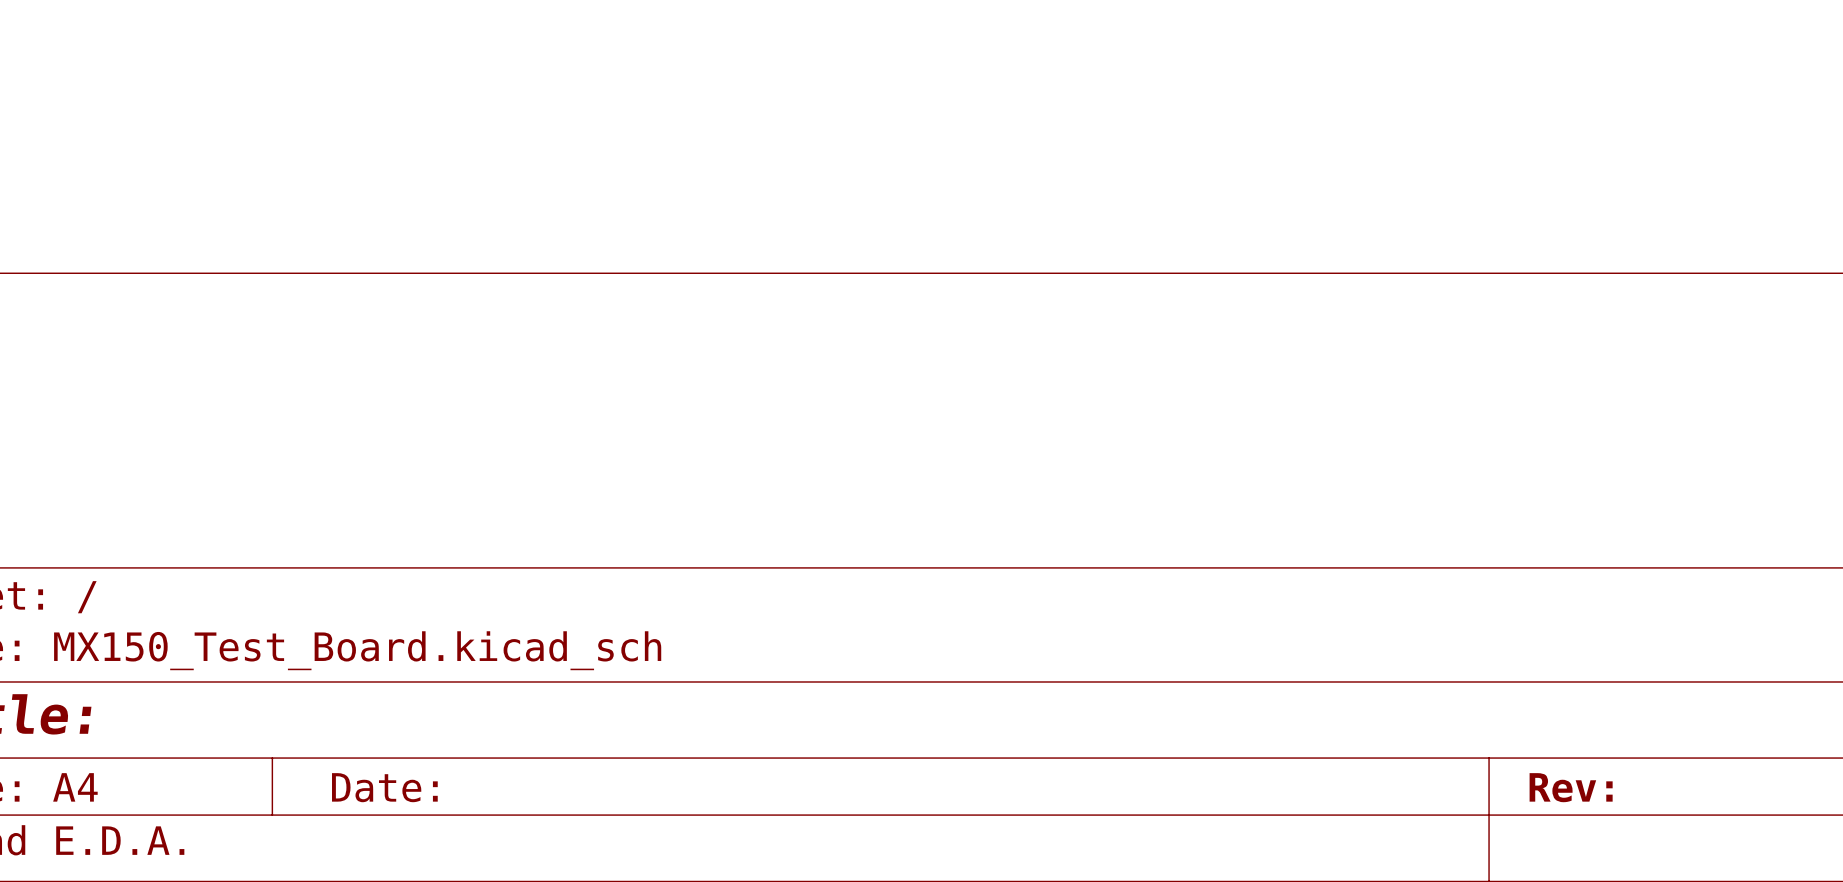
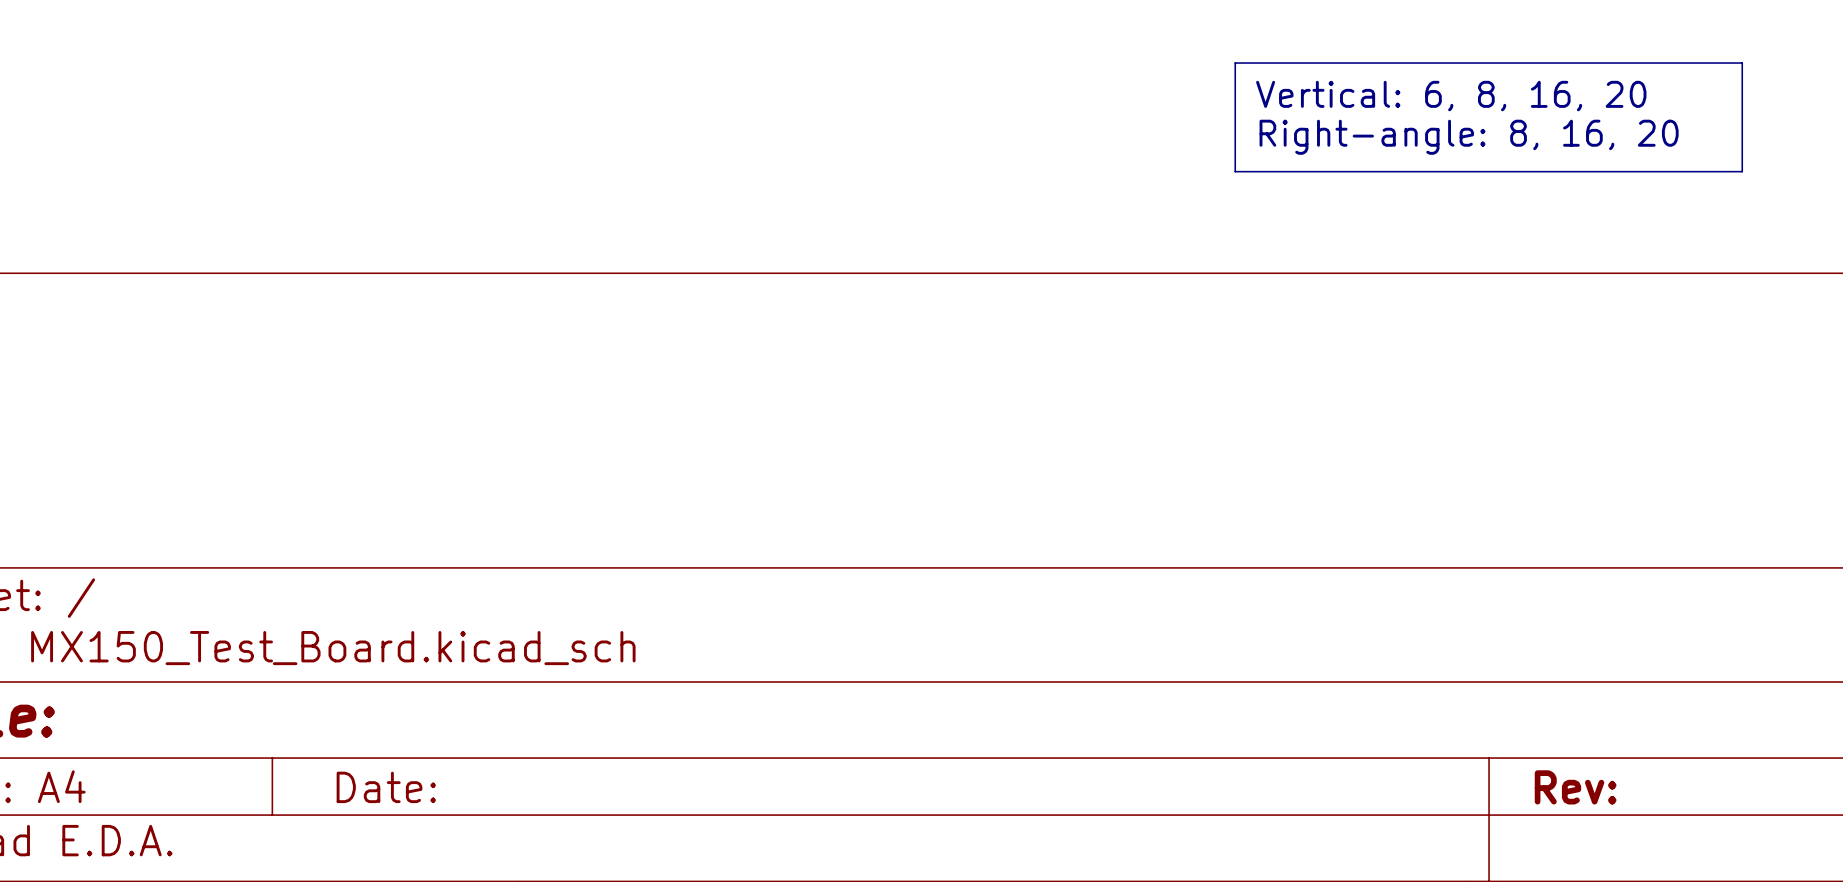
line: none -> (1235, 63) (1742, 63) (1742, 171) (1235, 171) (1235, 63)
text: none -> Vertical: 6, 8, 16, 20 (1451, 96)
text: none -> Right-angle: 8, 16, 20 (1469, 137)

